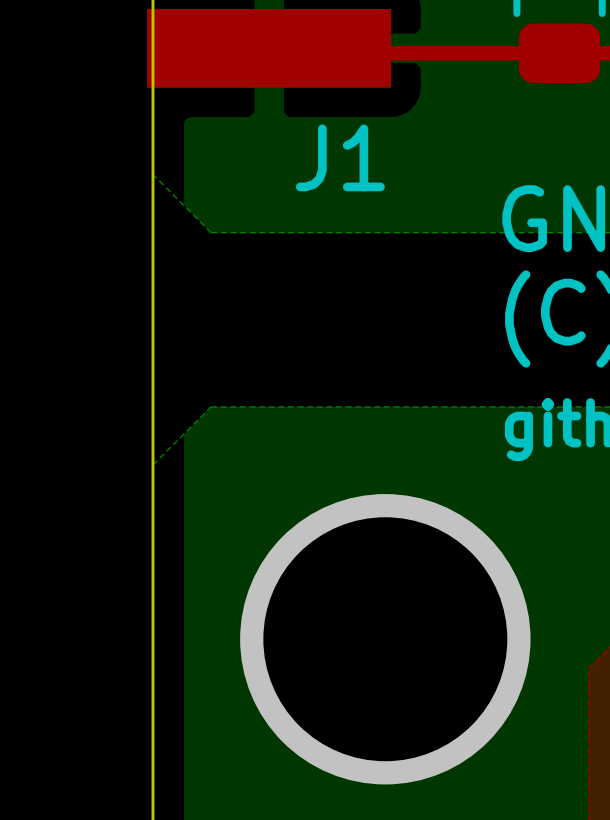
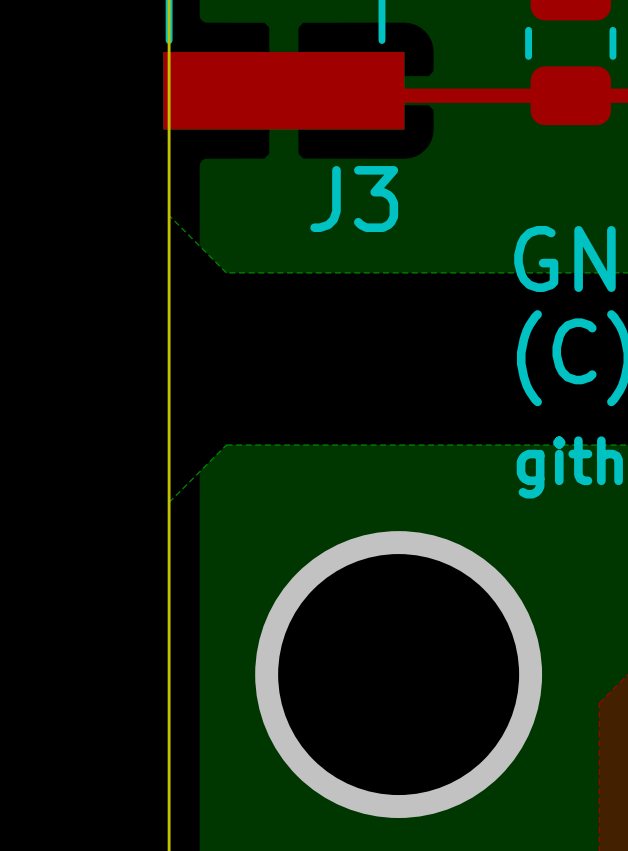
J1 name: J1 (340, 157) -> J3 (354, 199)

